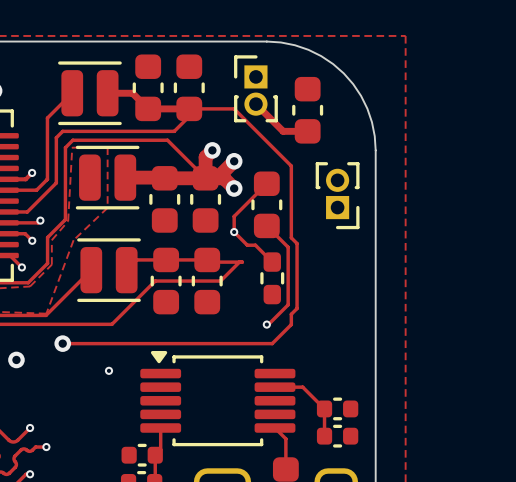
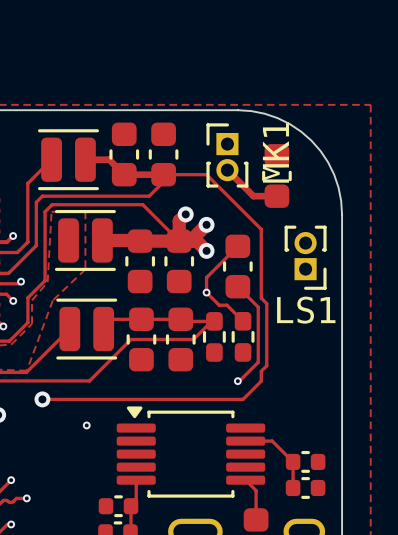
MK1 name: none -> MK1 (275, 152)
LS1 name: none -> LS1 (306, 310)
part: none -> (214, 336)

